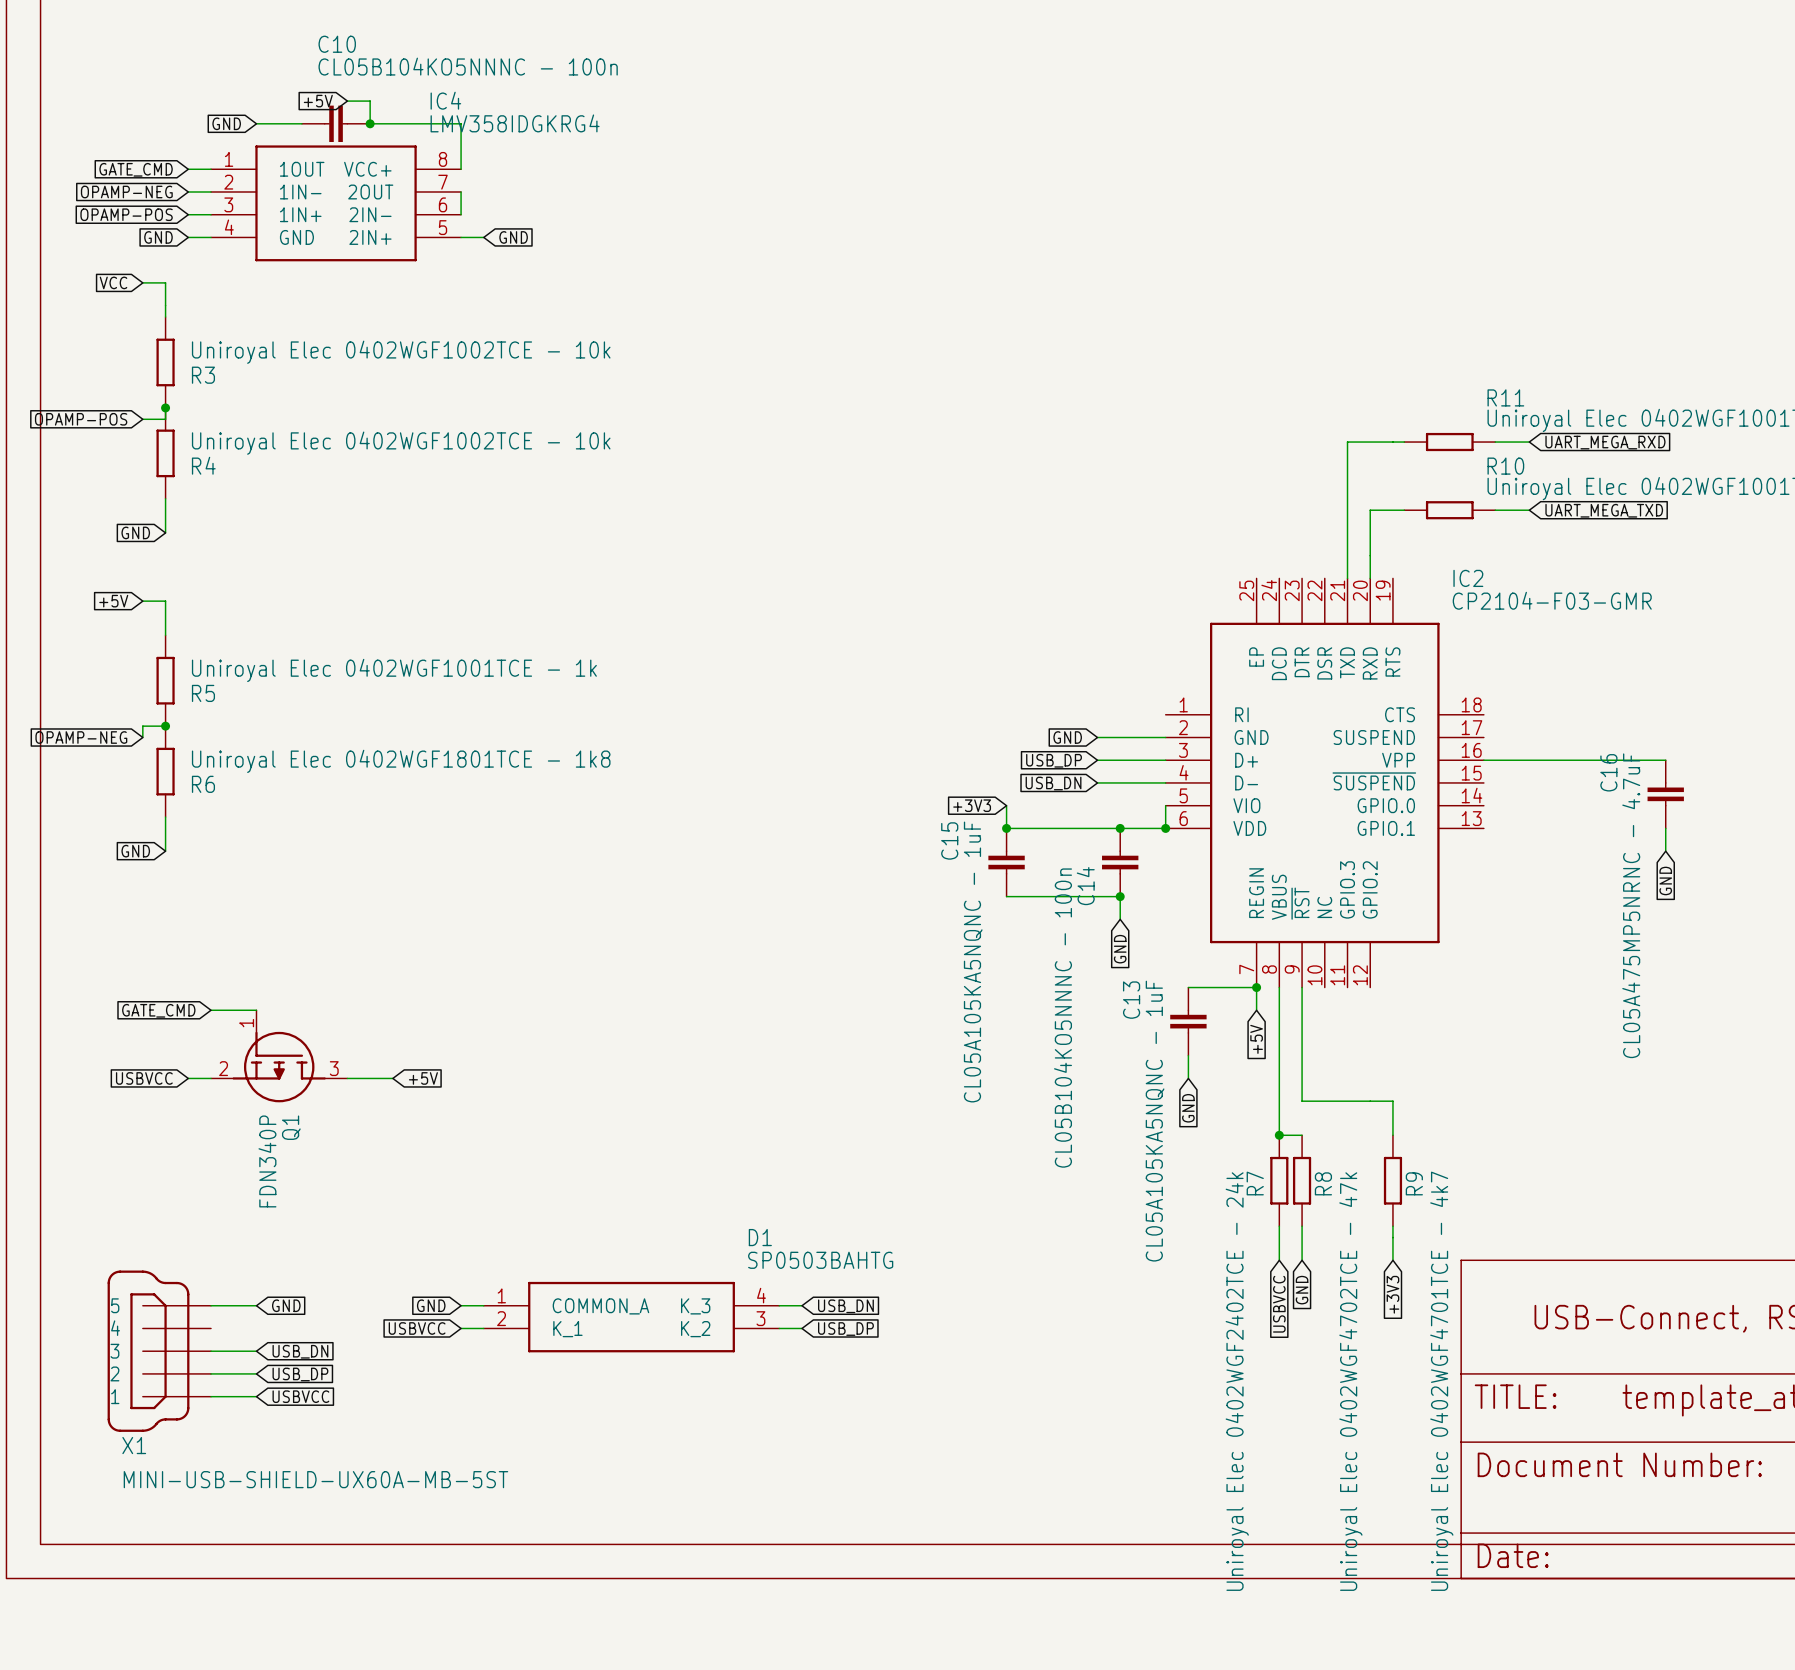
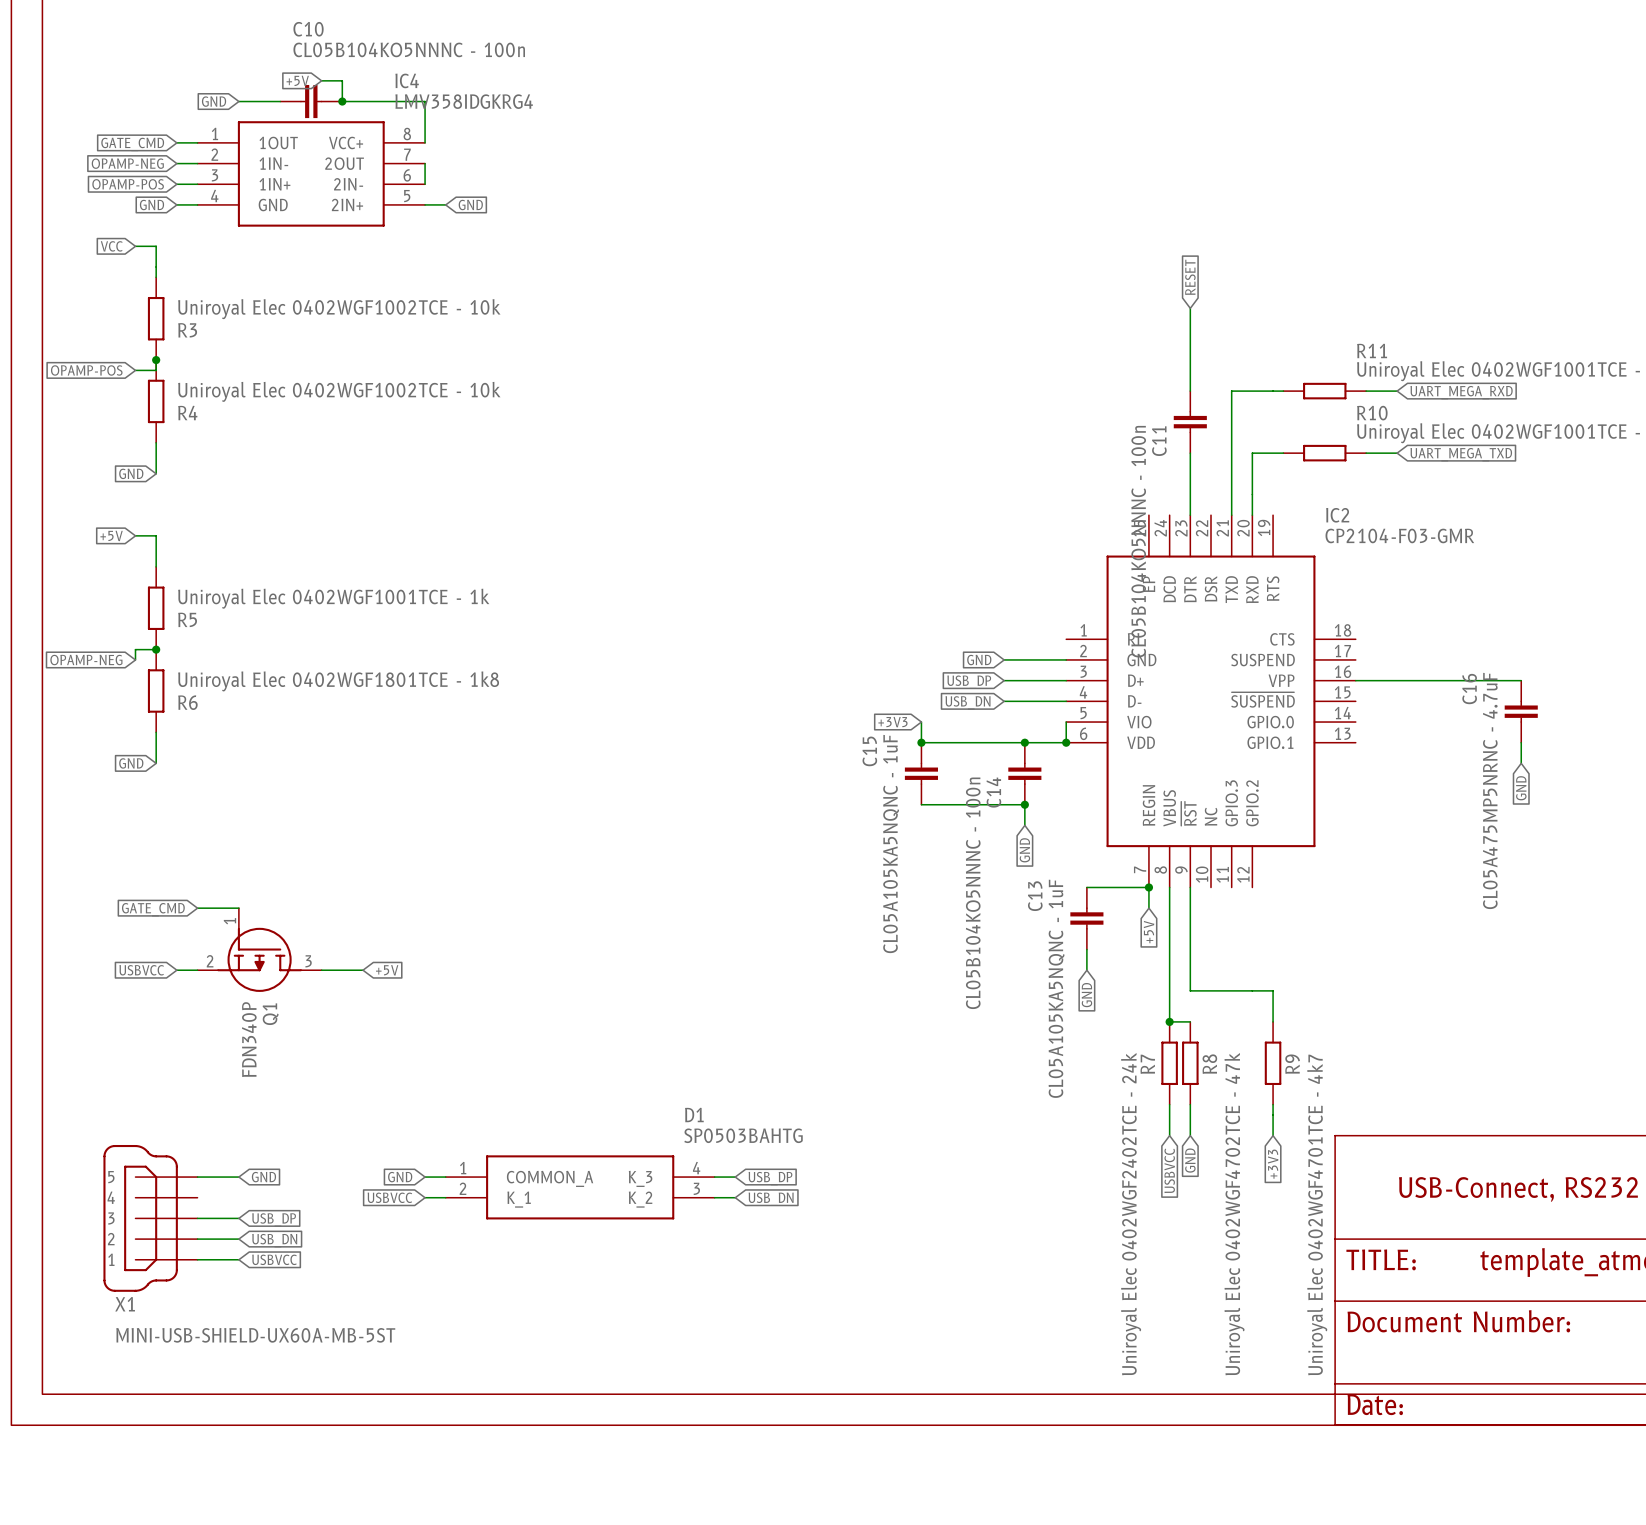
global label: none -> RESET (1190, 277)
wire: none -> (1190, 308) (1190, 391)
C11: none -> CL05B104KO5NNNC - 100n (1190, 422)
wire: none -> (1190, 453) (1190, 515)
global label: USB_DN (845, 1306) -> USB_DP (770, 1178)
global label: USB_DP (845, 1329) -> USB_DN (771, 1199)
global label: USB_DN (300, 1351) -> USB_DP (274, 1219)
global label: USB_DP (300, 1374) -> USB_DN (274, 1240)

